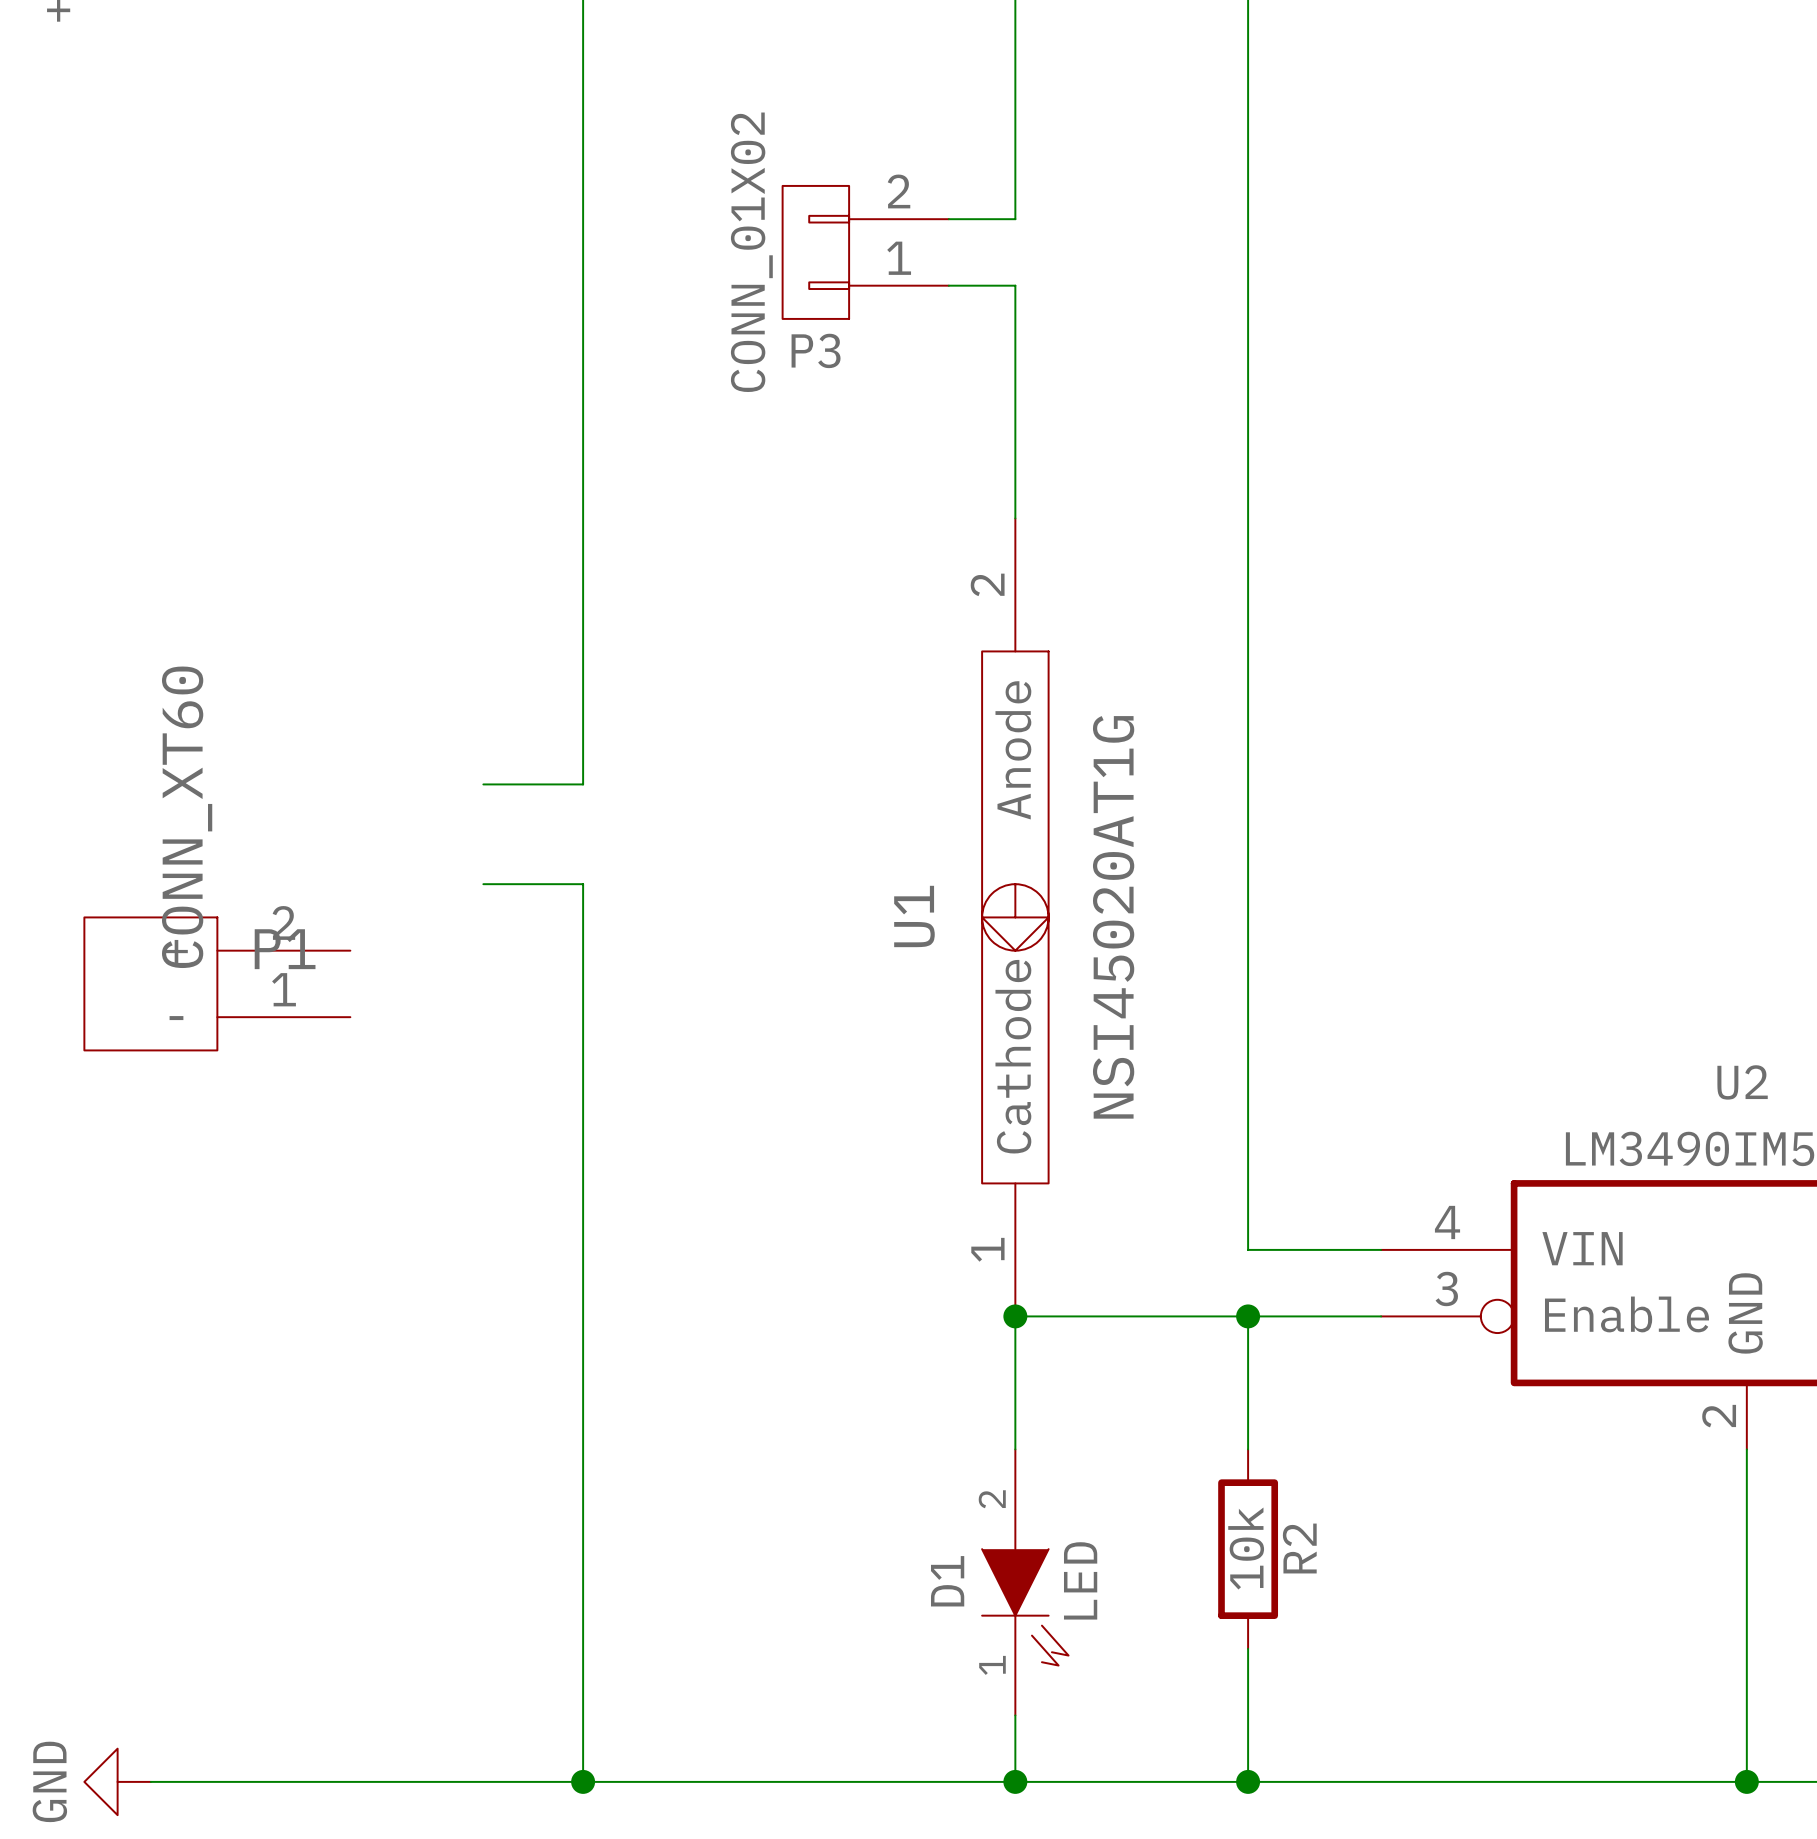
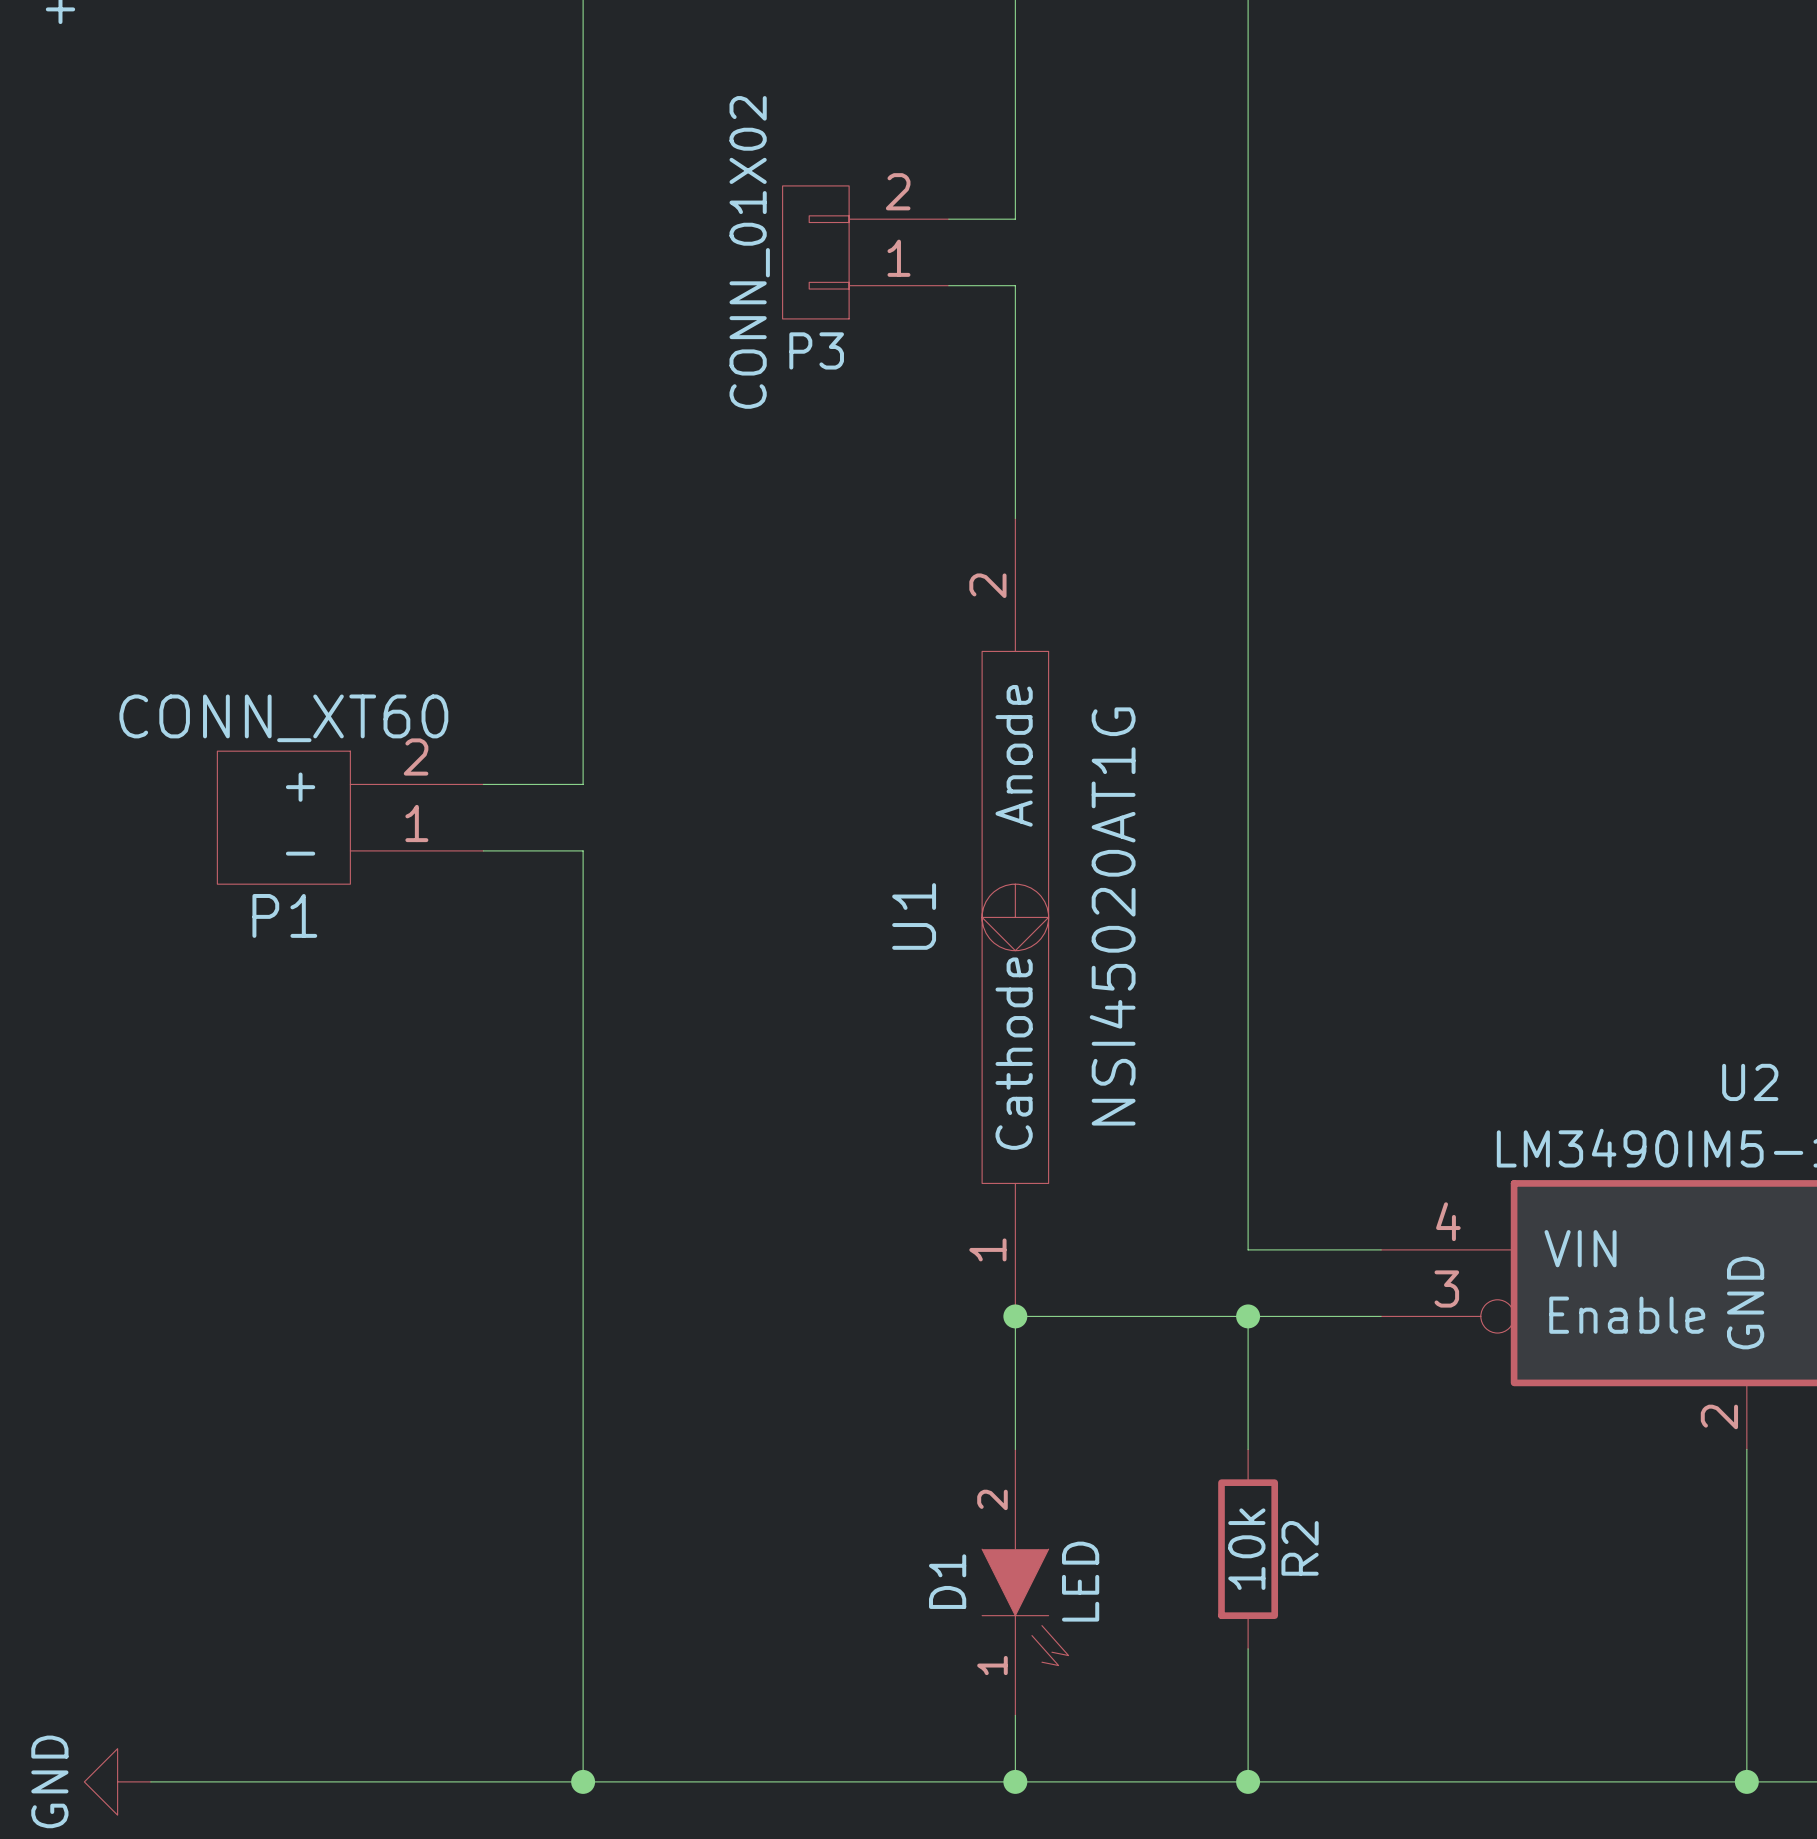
P1 value rotation: 0° (187, 817) -> 90° clockwise (283, 718)
wire: (483, 884) (583, 884) -> (483, 850) (583, 850) (583, 884)
P1 name position: P1 (285, 949) -> P1 (284, 915)
P1 position: (217, 983) -> (350, 817)

